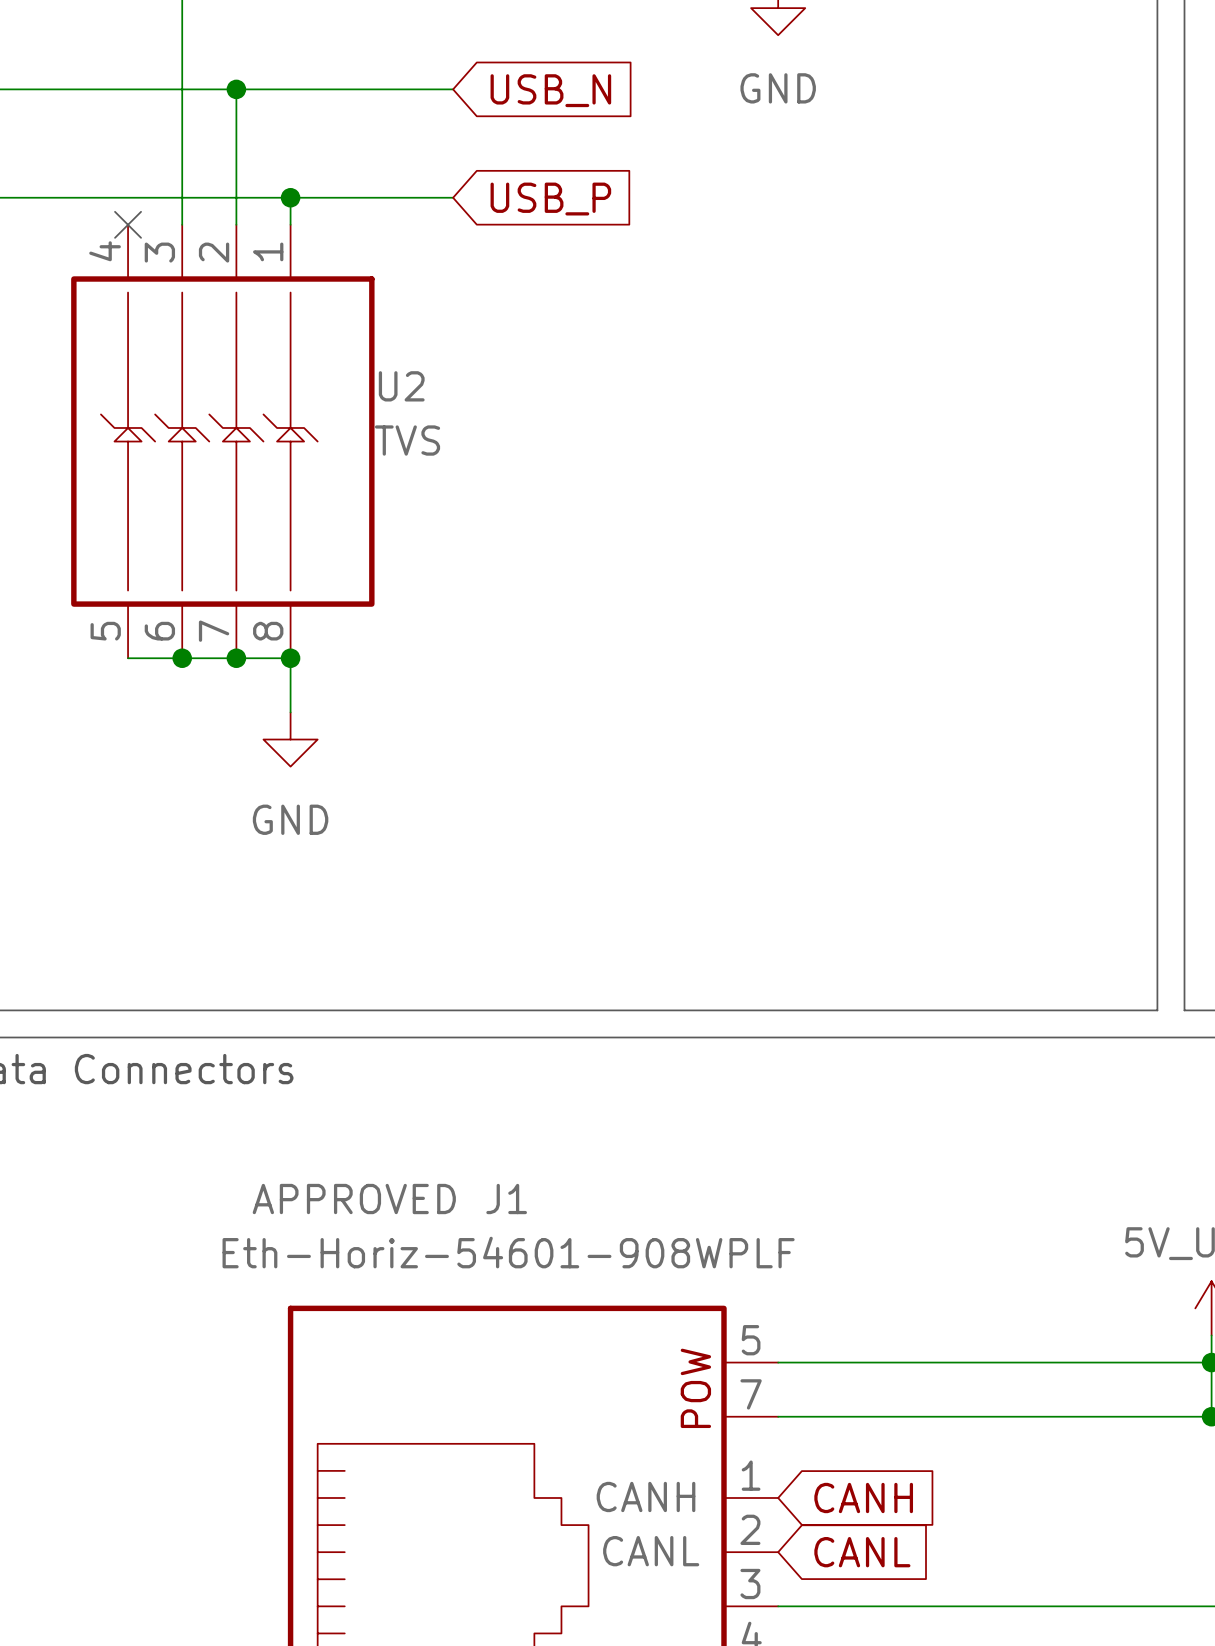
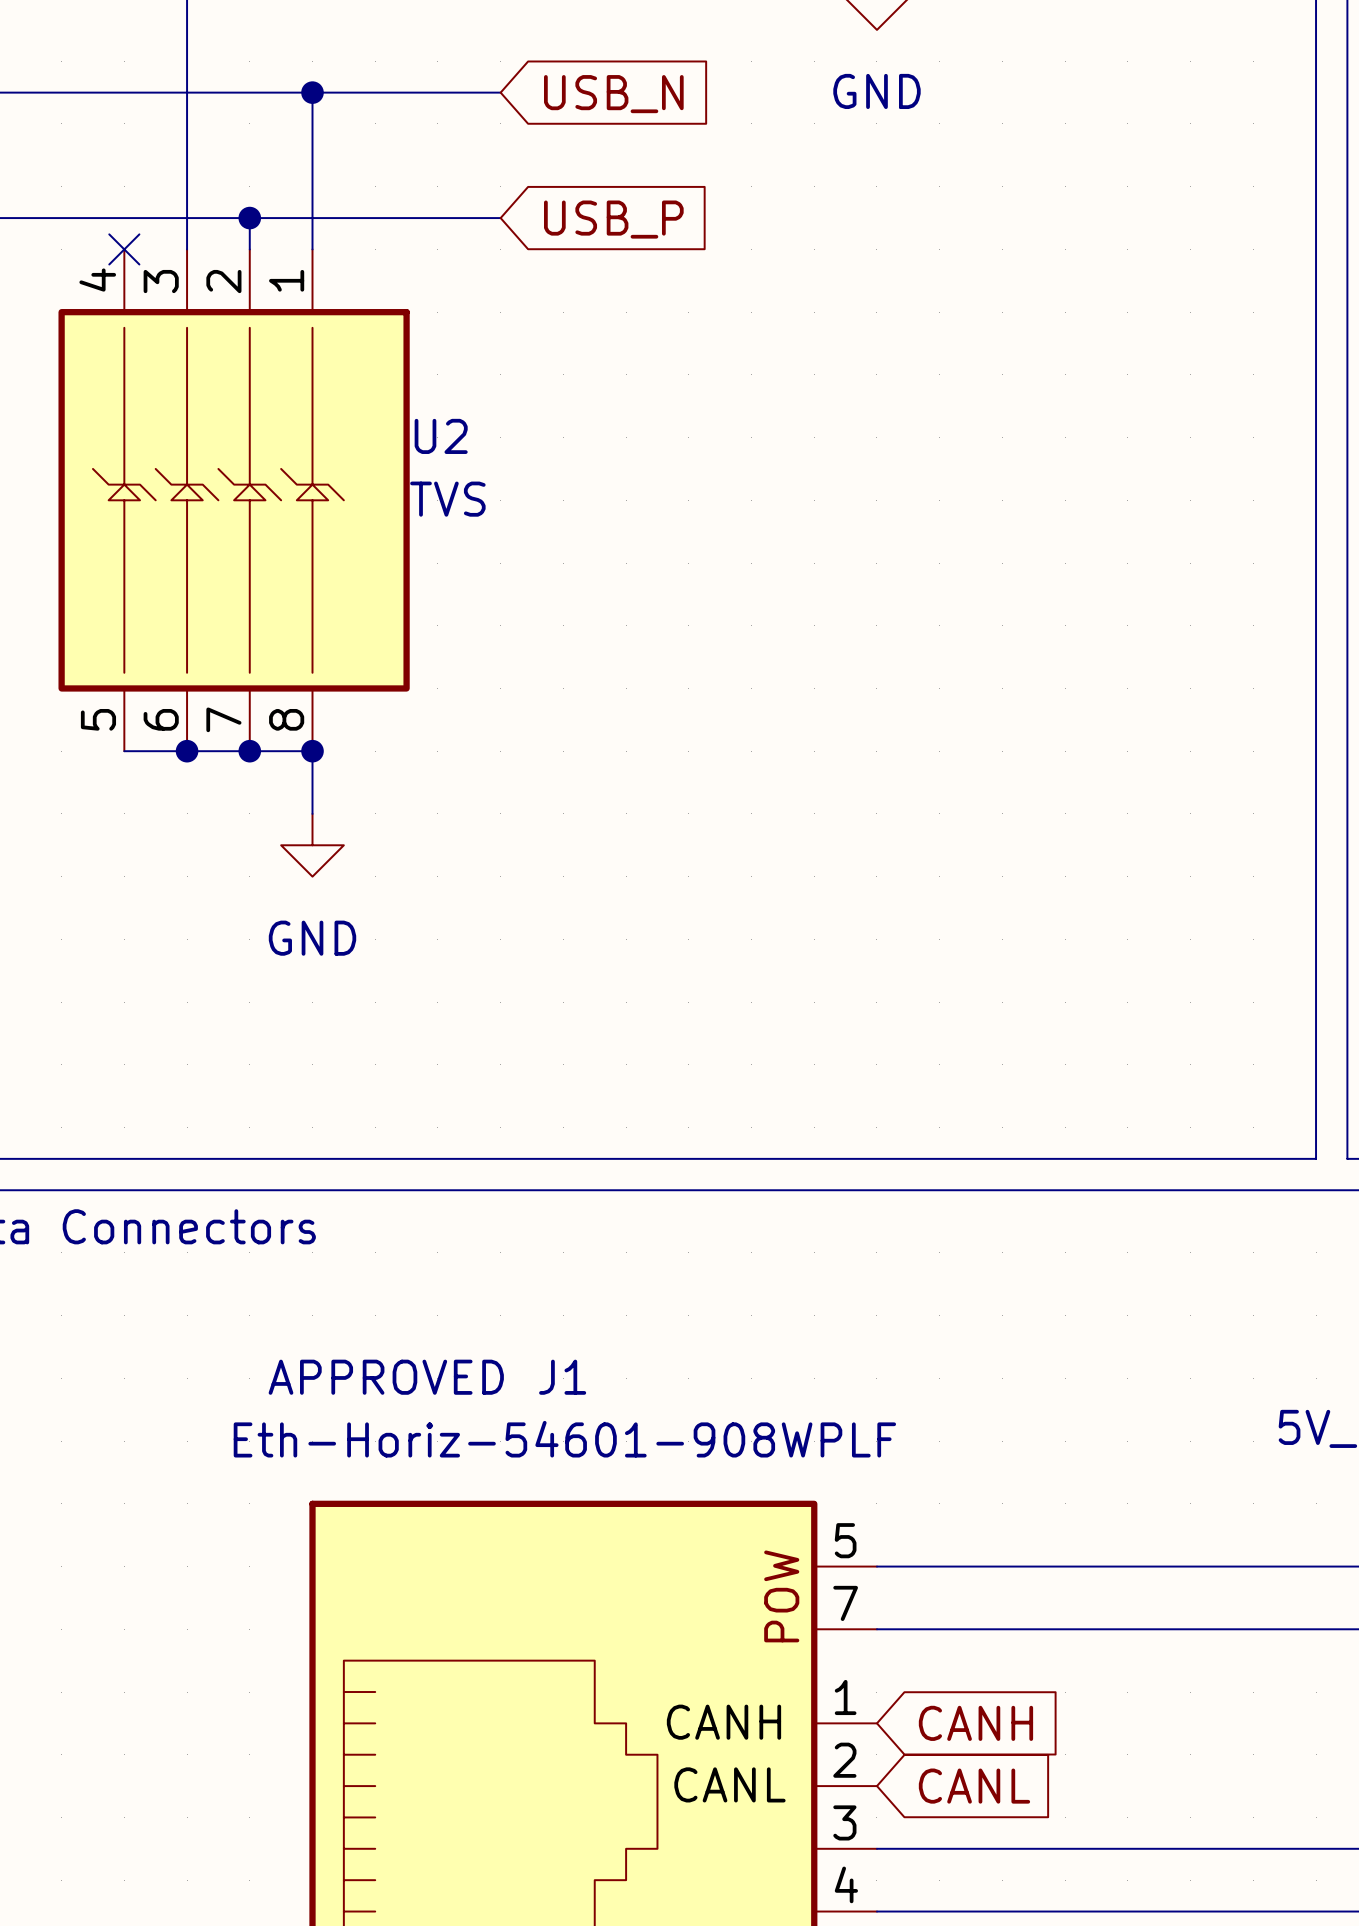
wire: (236, 89) (236, 197) -> (312, 92) (312, 218)
junction: (236, 89) -> none
junction: none -> (312, 92)
junction: none -> (249, 218)
junction: (290, 197) -> none

